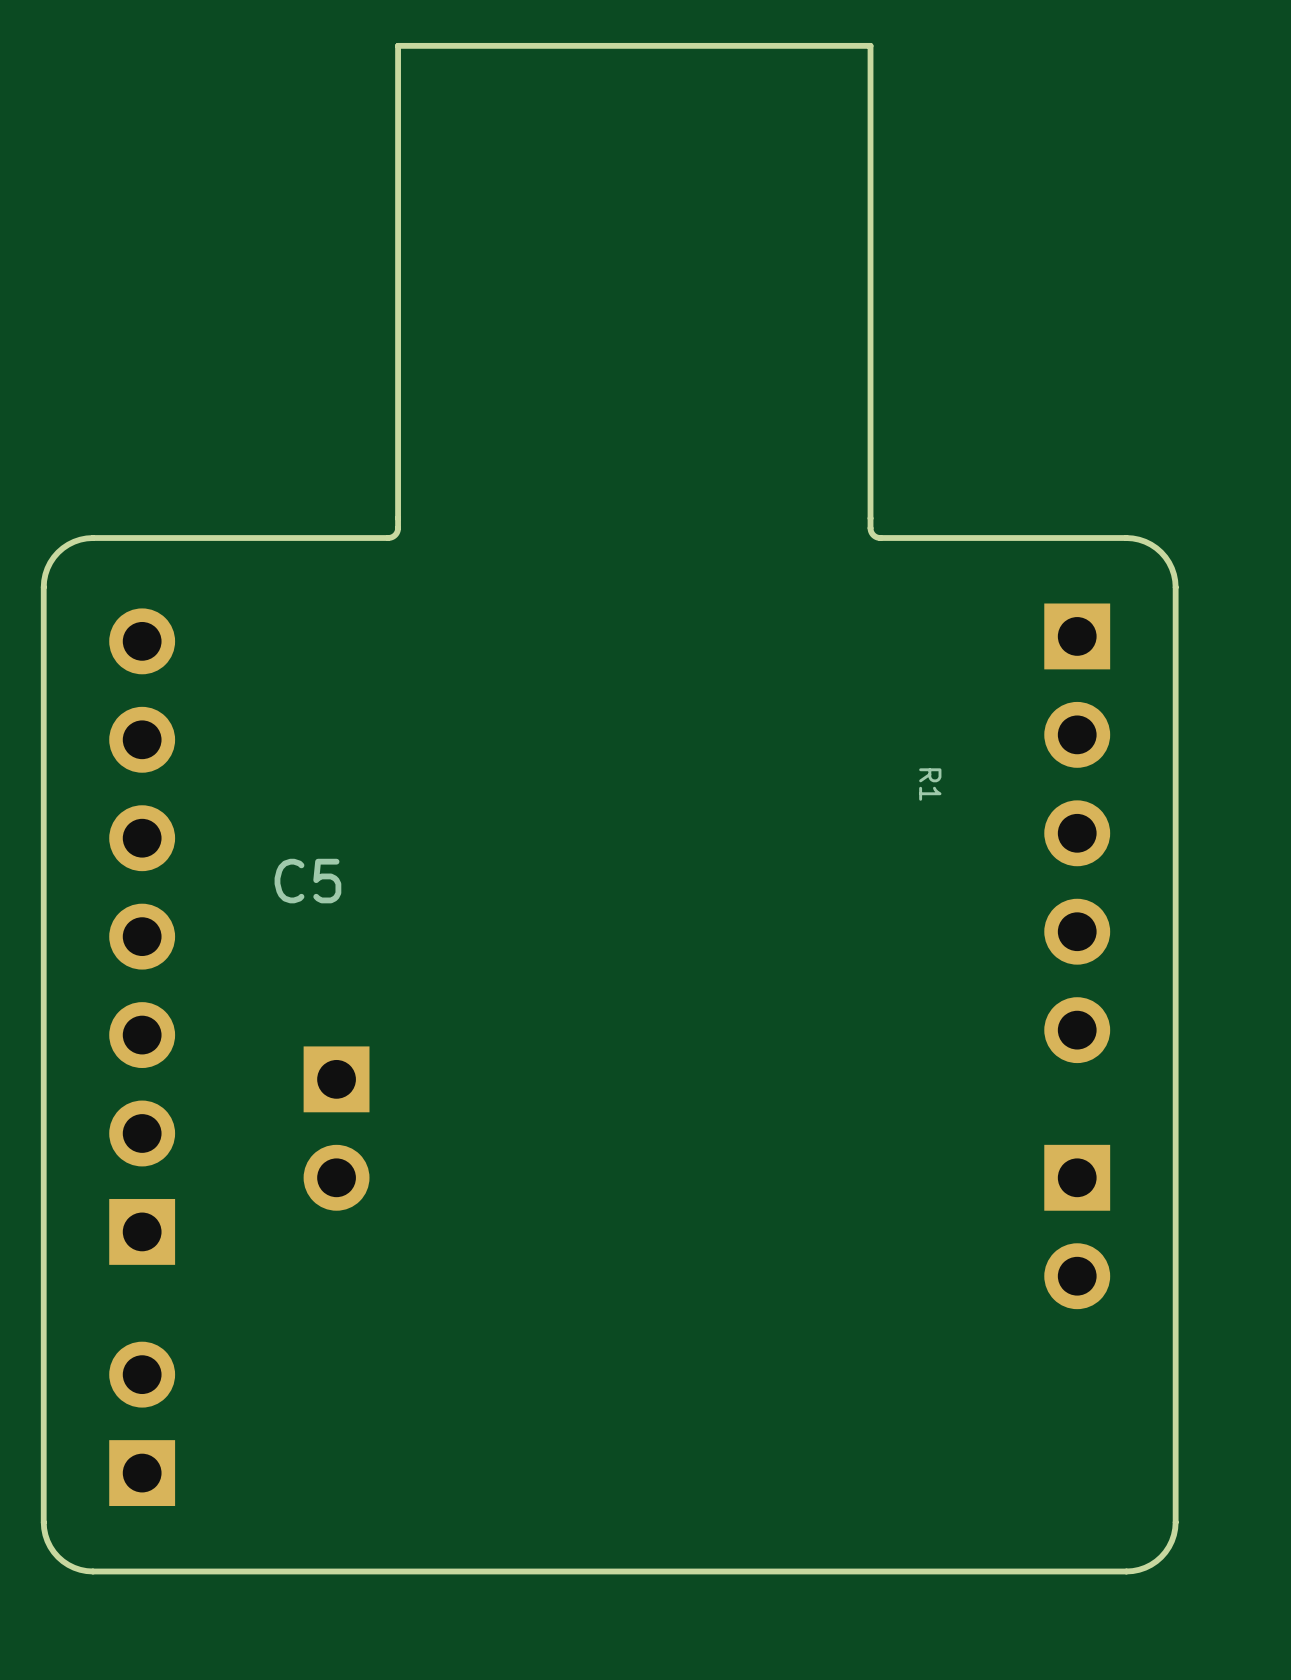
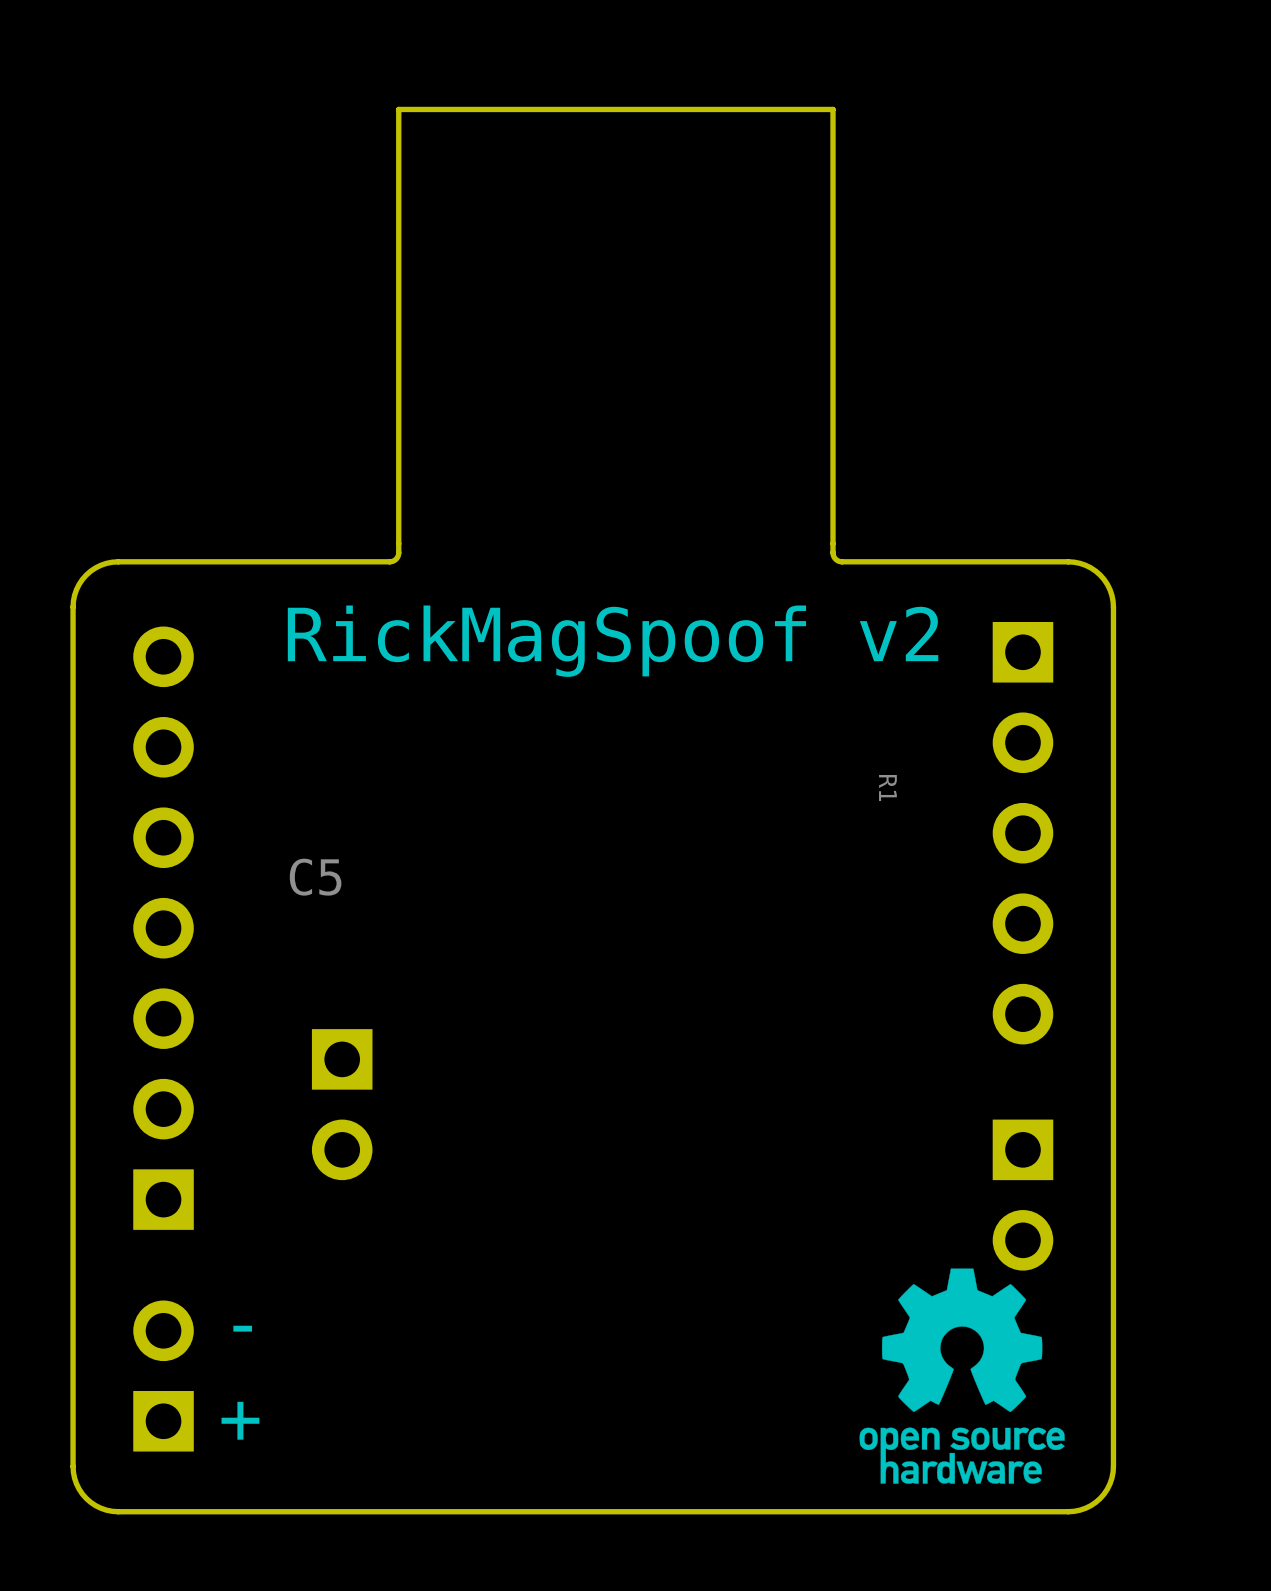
text: none -> RickMagSpoof v2 (613, 641)
drawing: none -> [859, 1268, 1065, 1484]
text: none -> - (242, 1328)
text: none -> + (240, 1420)

